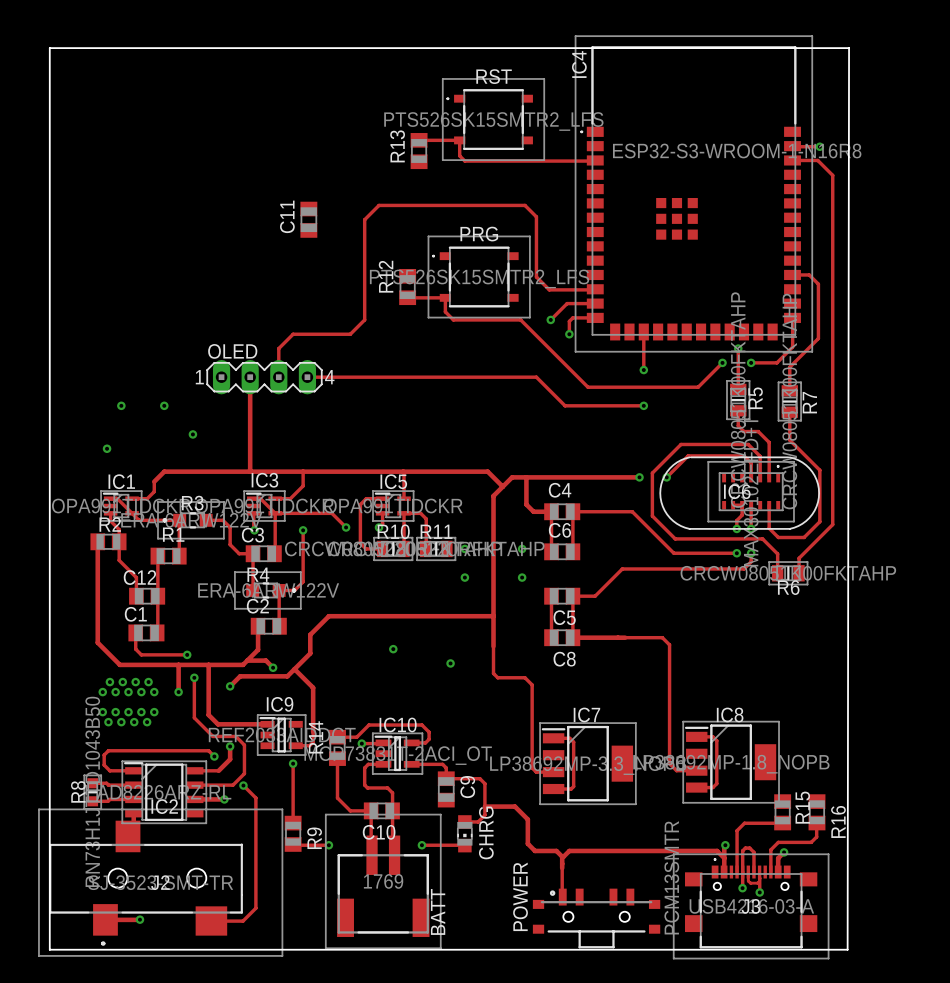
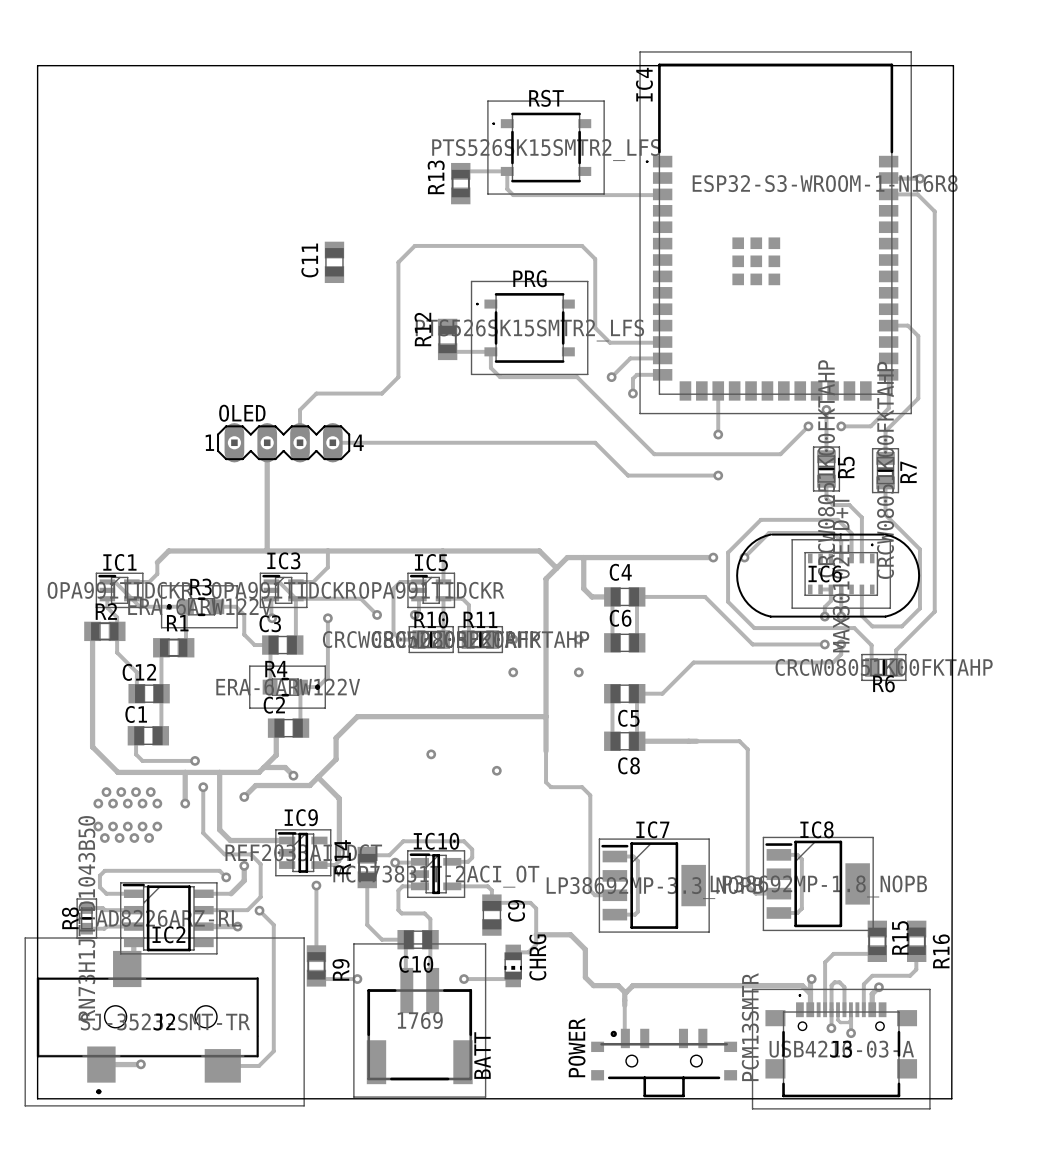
via: (121, 405) -> none
via: (164, 405) -> none
via: (192, 434) -> none
via: (107, 448) -> none

